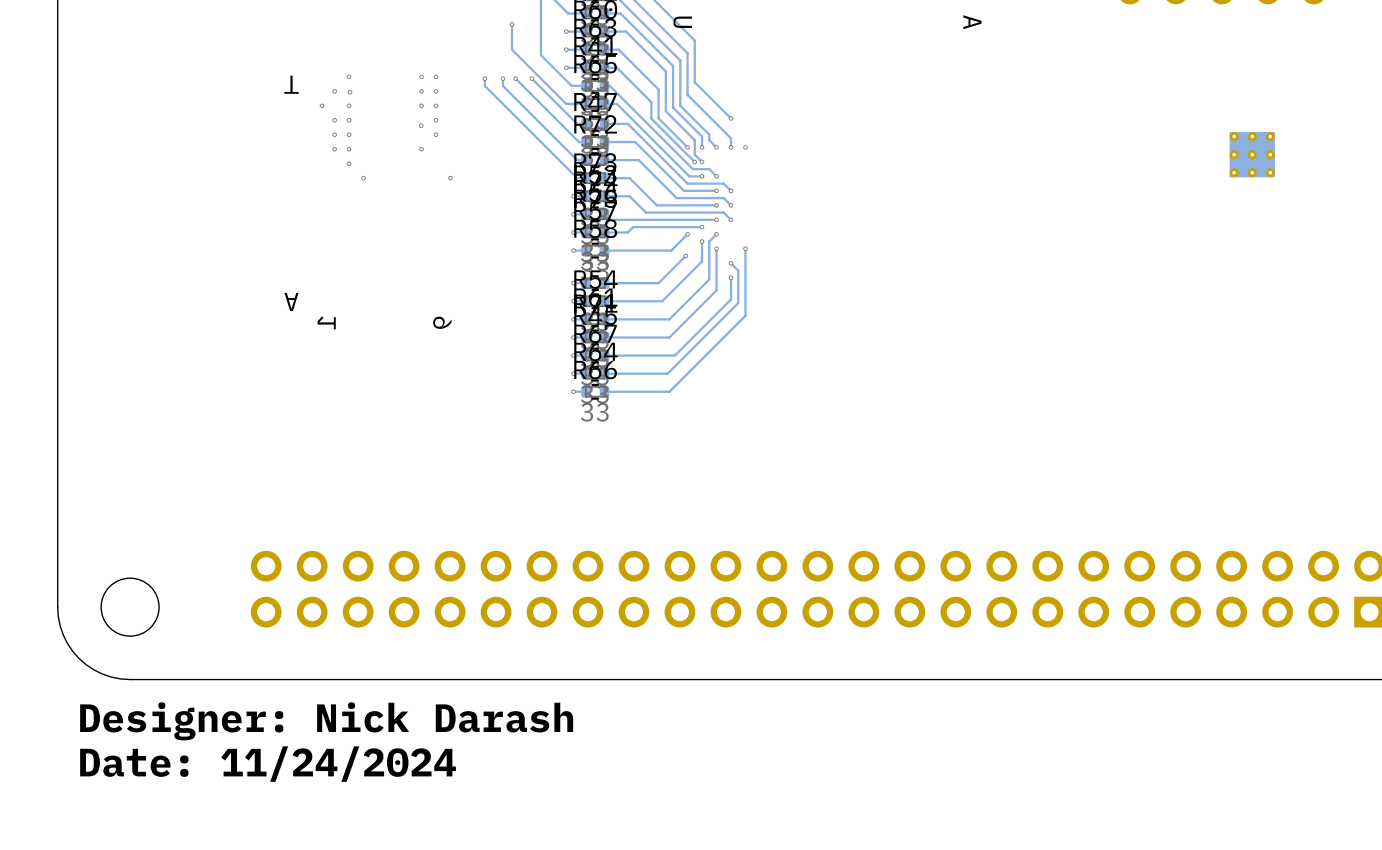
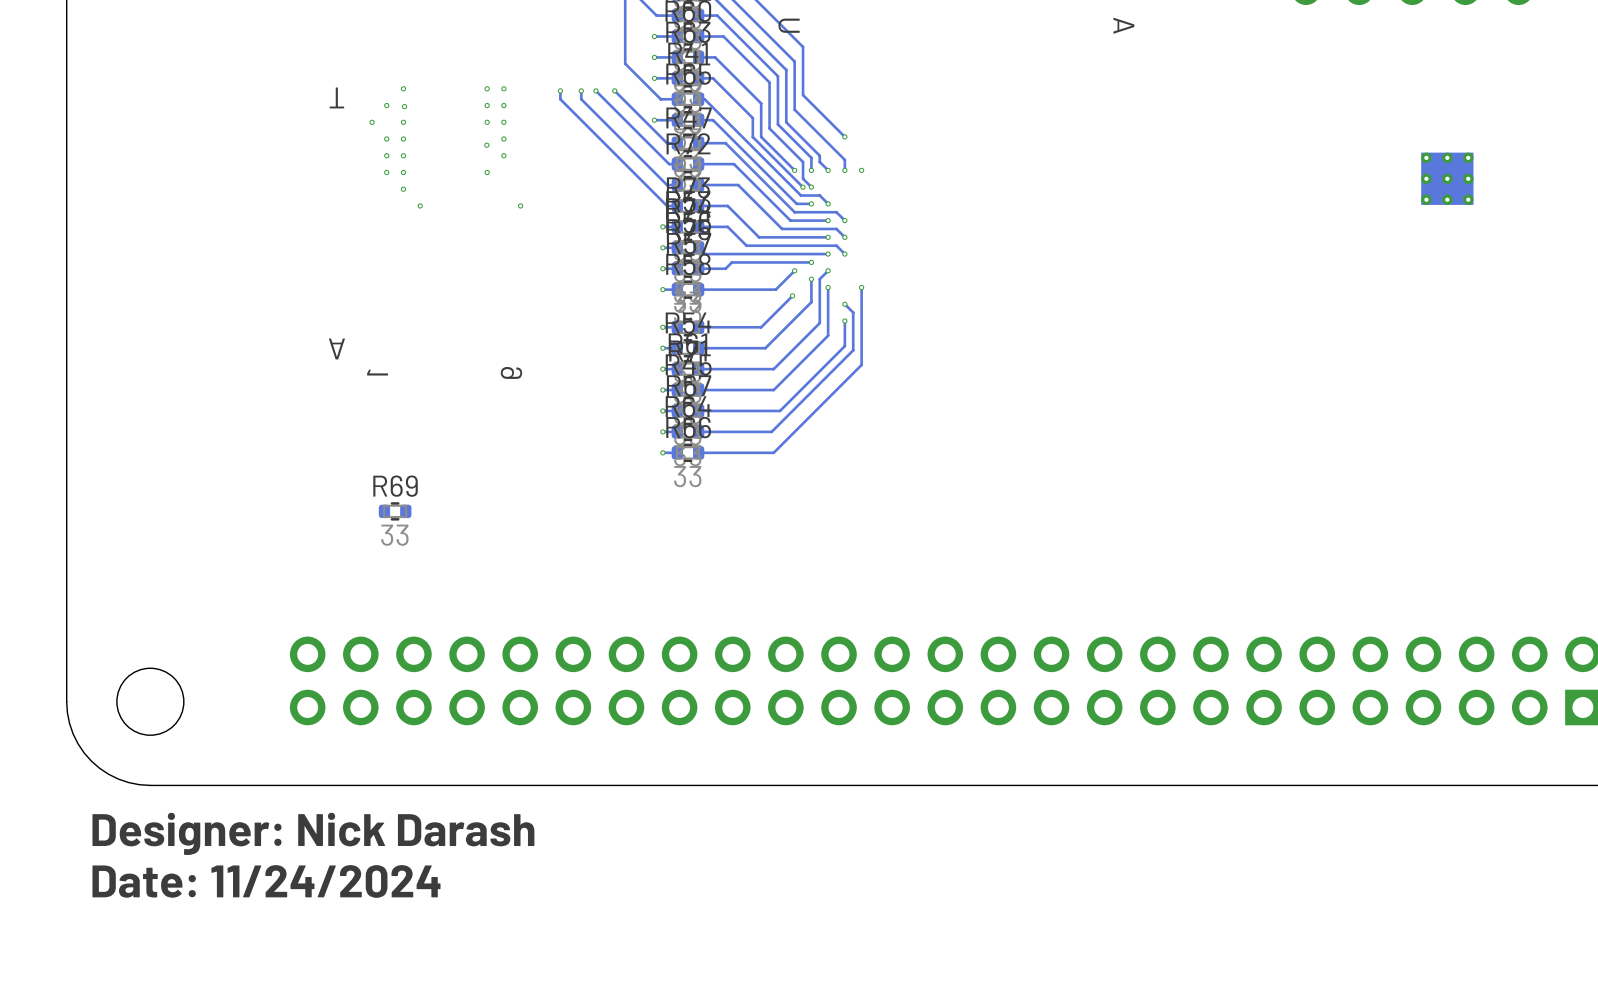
track: (511, 24) (511, 49) (566, 103) -> none
via position: (511, 24) -> (654, 120)
R69: none -> 33 (395, 511)

